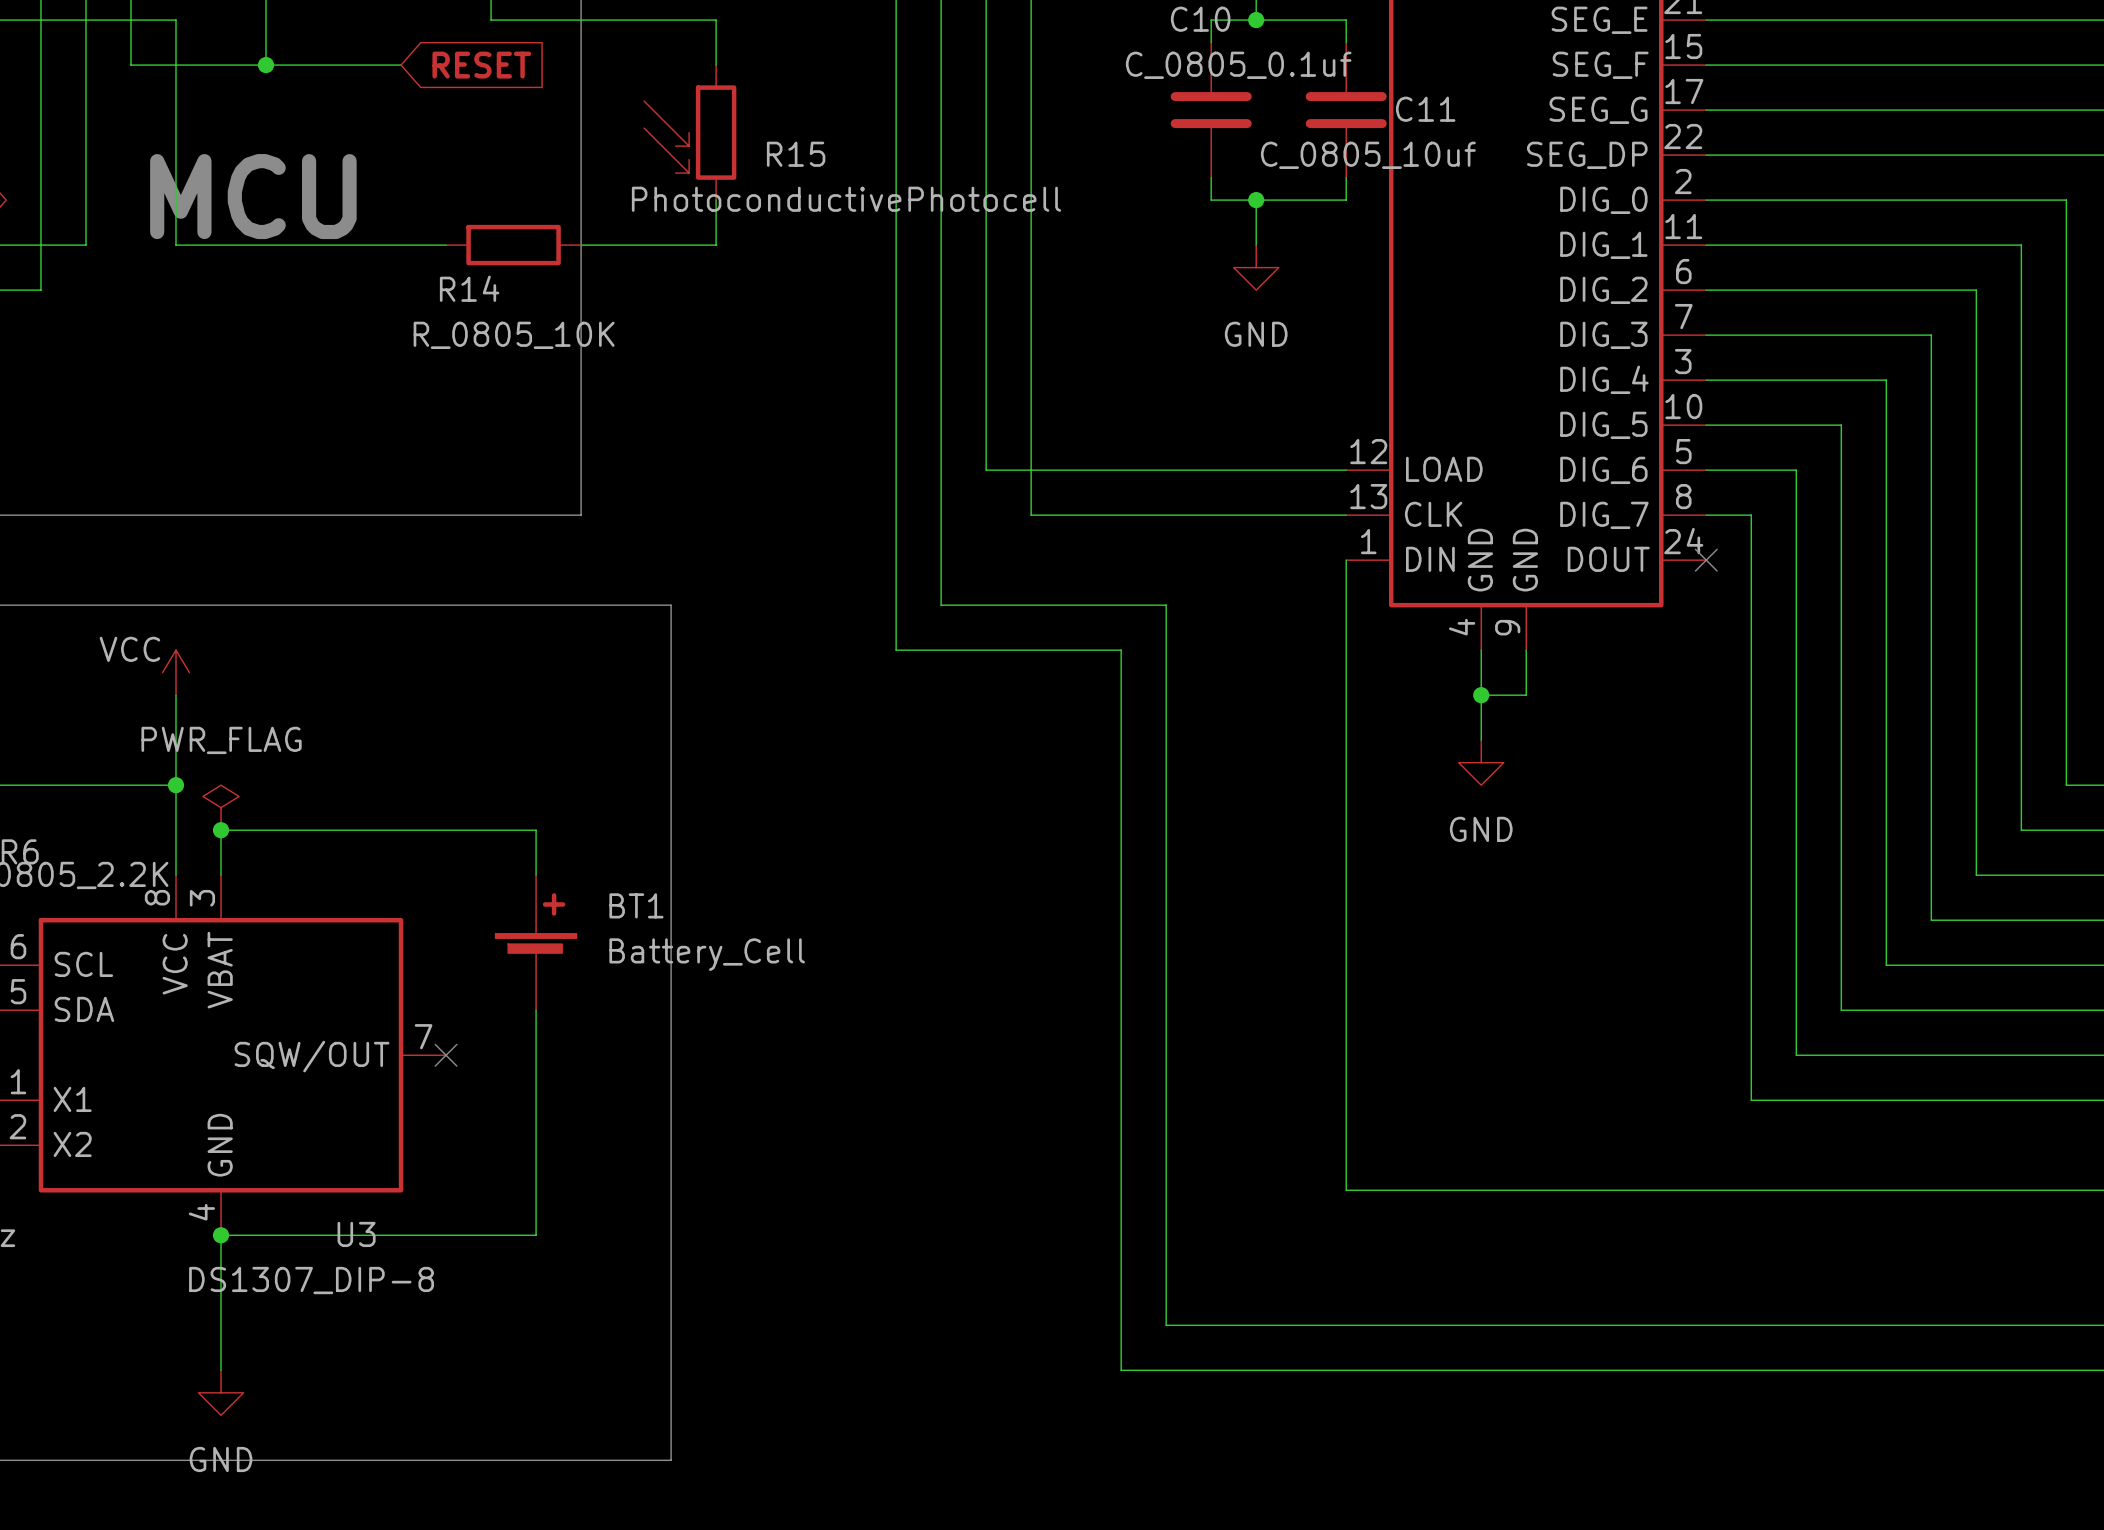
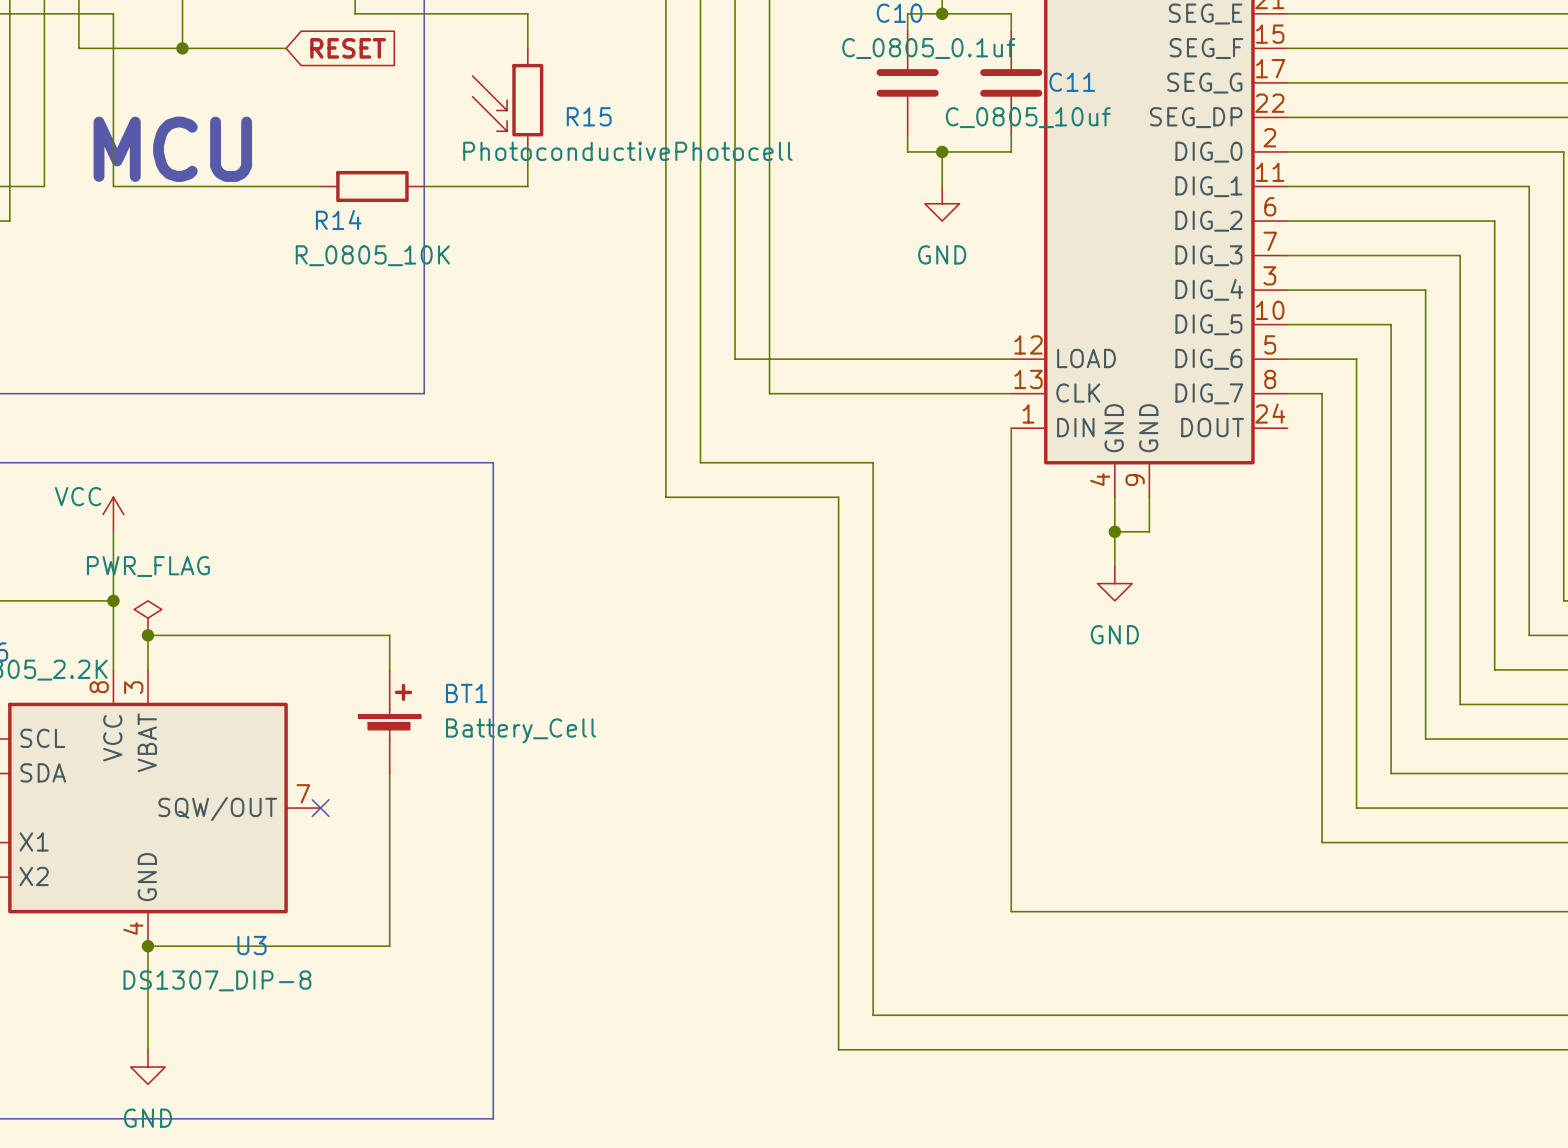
no-connect mark: (1706, 560) -> none

